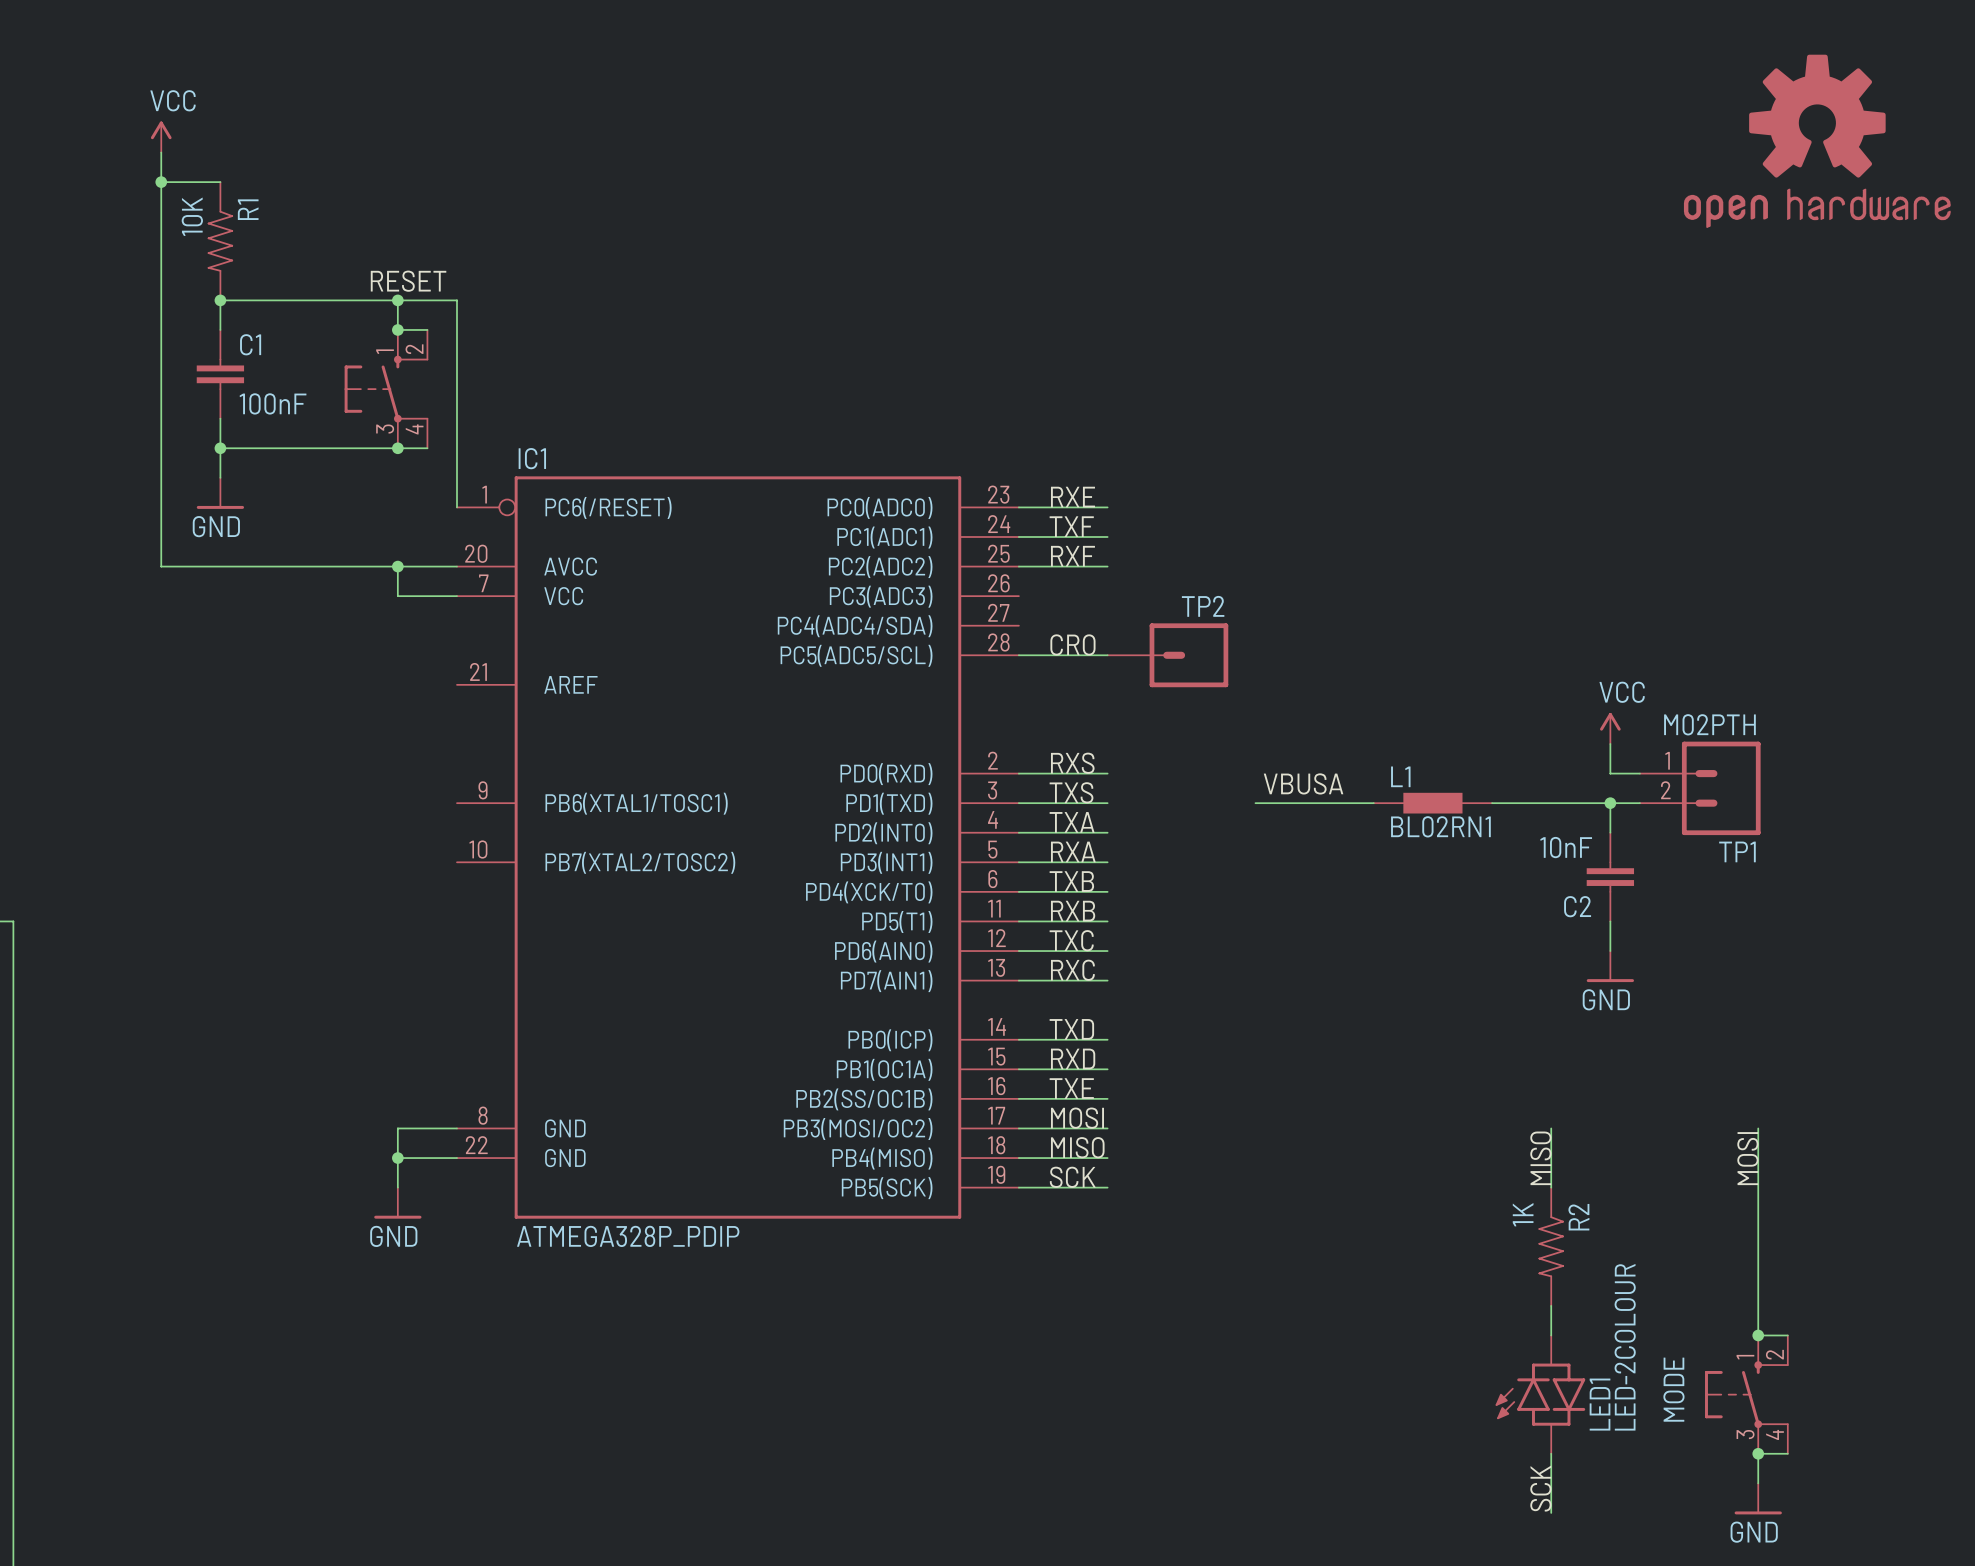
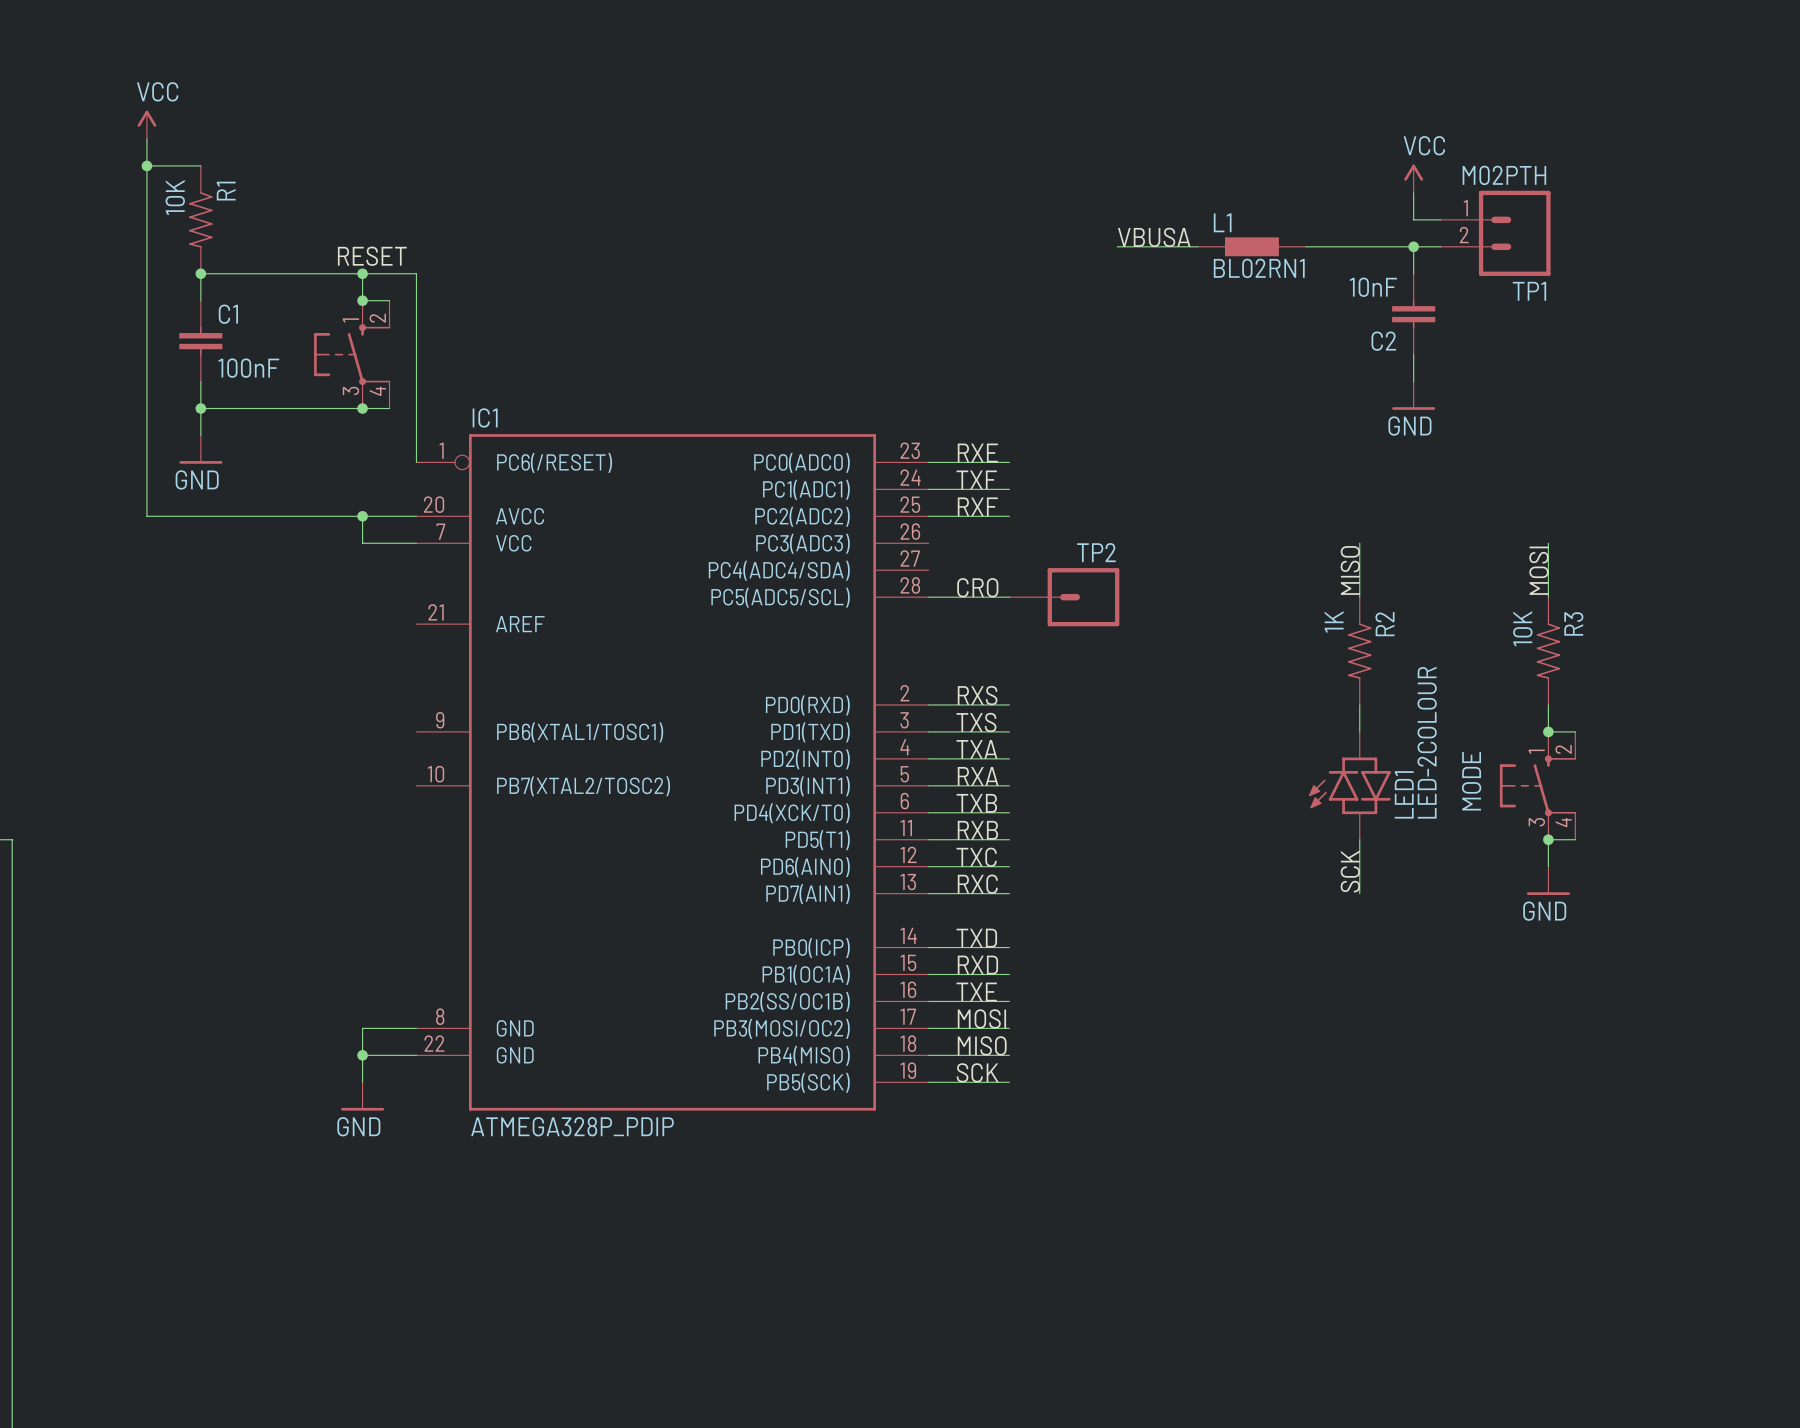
part: (1817, 141) -> none
power symbol: none -> VCC (1413, 178)
wire: none -> (1413, 192) (1413, 219) (1440, 219)
label: none -> VBUSA (1154, 237)
wire: none -> (1117, 246) (1198, 246)
wire: none -> (1305, 246) (1440, 246)
wire: none -> (1413, 246) (1413, 273)
junction: none -> (1413, 246)
wire: none -> (1413, 354) (1413, 381)
power symbol: none -> GND (1413, 395)
wire: none -> (1359, 543) (1359, 597)
wire: none -> (1548, 543) (1548, 597)
label: none -> MISO (1350, 570)
label: none -> MOSI (1538, 570)
R3: none -> 10K (1548, 651)
power symbol: VCC (1610, 728) -> none
wire: (1610, 744) (1610, 773) (1639, 773) -> (1548, 704) (1548, 731) (1575, 731)
label: VBUSA (1303, 783) -> none
TP1 position: (1700, 788) -> (1495, 233)
wire: (1255, 803) (1373, 803) -> none
L1 position: (1432, 803) -> (1251, 246)
wire: (1492, 803) (1639, 803) -> (1359, 731) (1359, 704)
wire: (1610, 803) (1610, 832) -> none
junction: (1610, 803) -> none
junction: none -> (1548, 731)
MODE: none -> (1538, 785)
C2 position: (1610, 877) -> (1413, 314)
wire: (1610, 921) (1610, 951) -> none
junction: none -> (1548, 839)
wire: none -> (1575, 839) (1548, 839) (1548, 866)
label: none -> SCK (1350, 871)
power symbol position: GND (1610, 966) -> GND (1548, 880)
wire: (1551, 1128) (1551, 1187) -> (1359, 839) (1359, 893)
wire: (1758, 1128) (1758, 1335) (1787, 1335) -> none
label: MISO (1540, 1158) -> none
label: MOSI (1747, 1158) -> none
R2 position: (1551, 1246) -> (1359, 651)
wire: (1551, 1305) (1551, 1335) -> none
junction: (1758, 1335) -> none
LED1 position: (1540, 1394) -> (1349, 785)
MODE: (1746, 1394) -> none
wire: (1551, 1453) (1551, 1512) -> none
junction: (1758, 1453) -> none
wire: (1787, 1453) (1758, 1453) (1758, 1483) -> none
label: SCK (1540, 1488) -> none
power symbol: GND (1758, 1498) -> none

